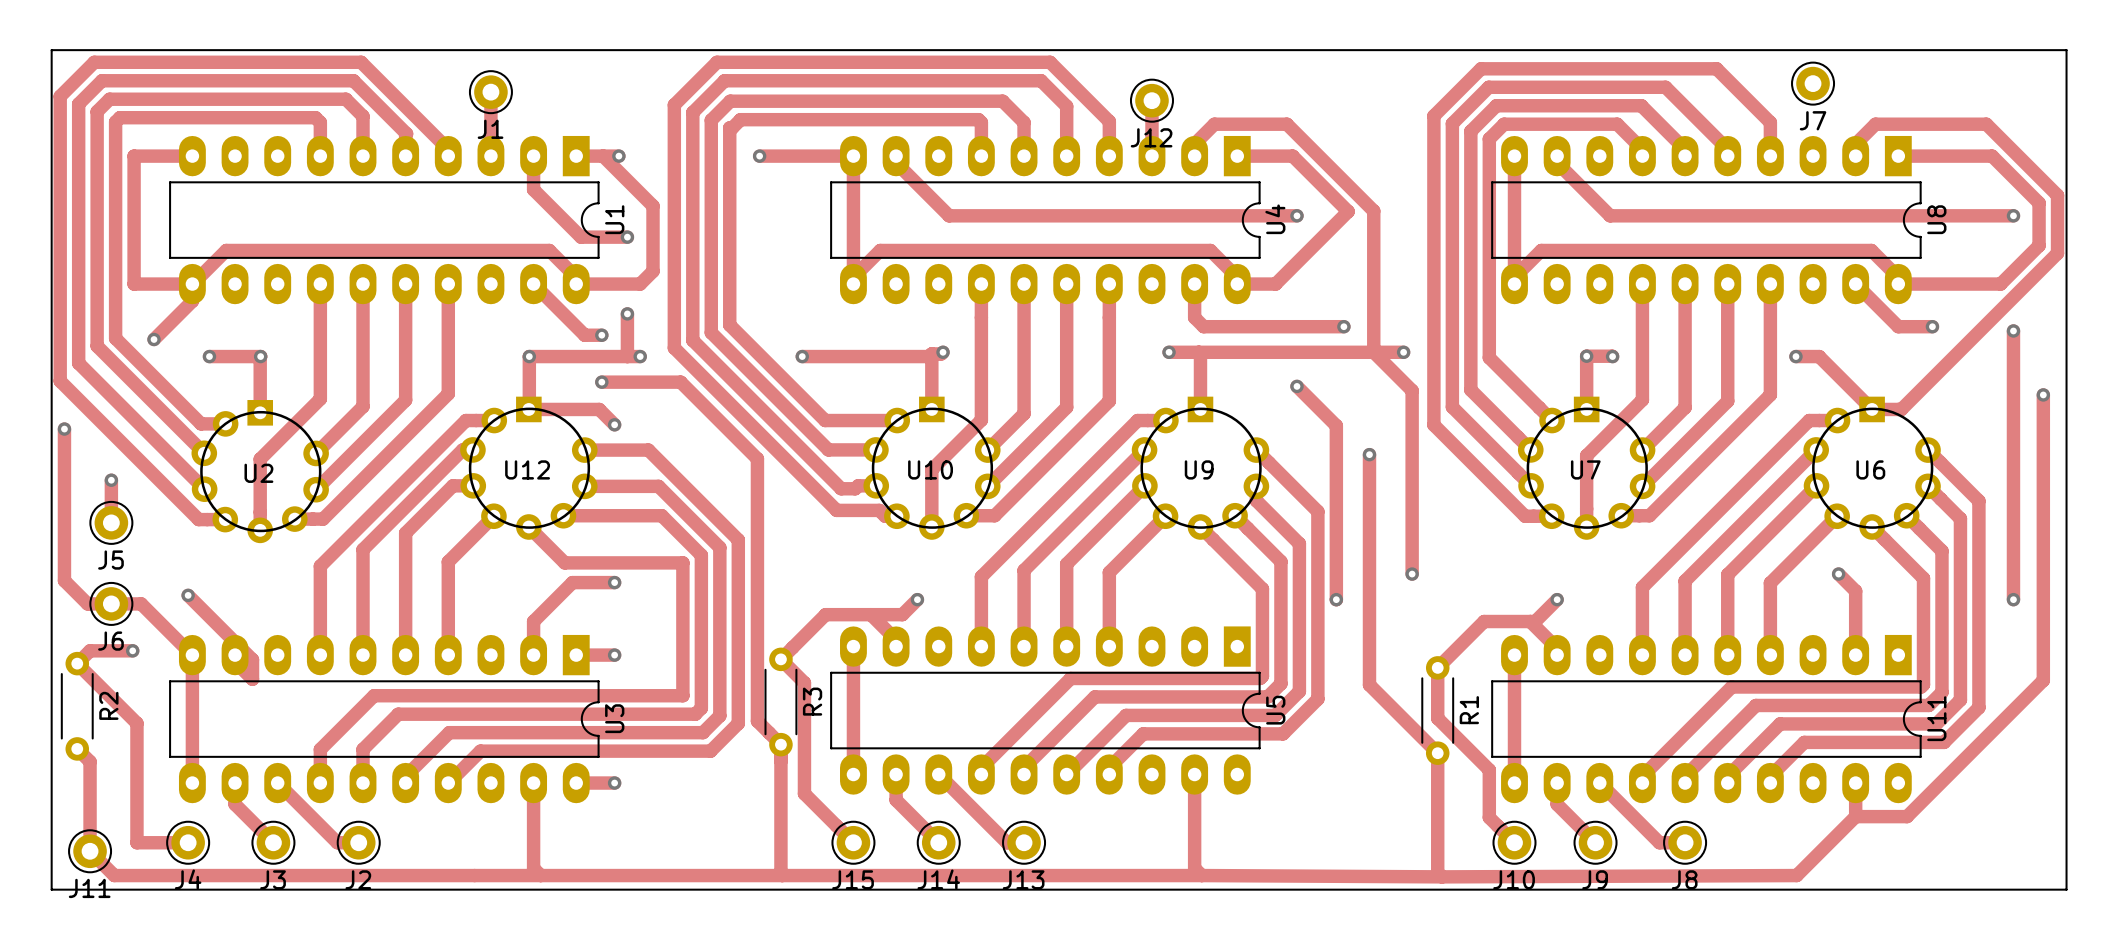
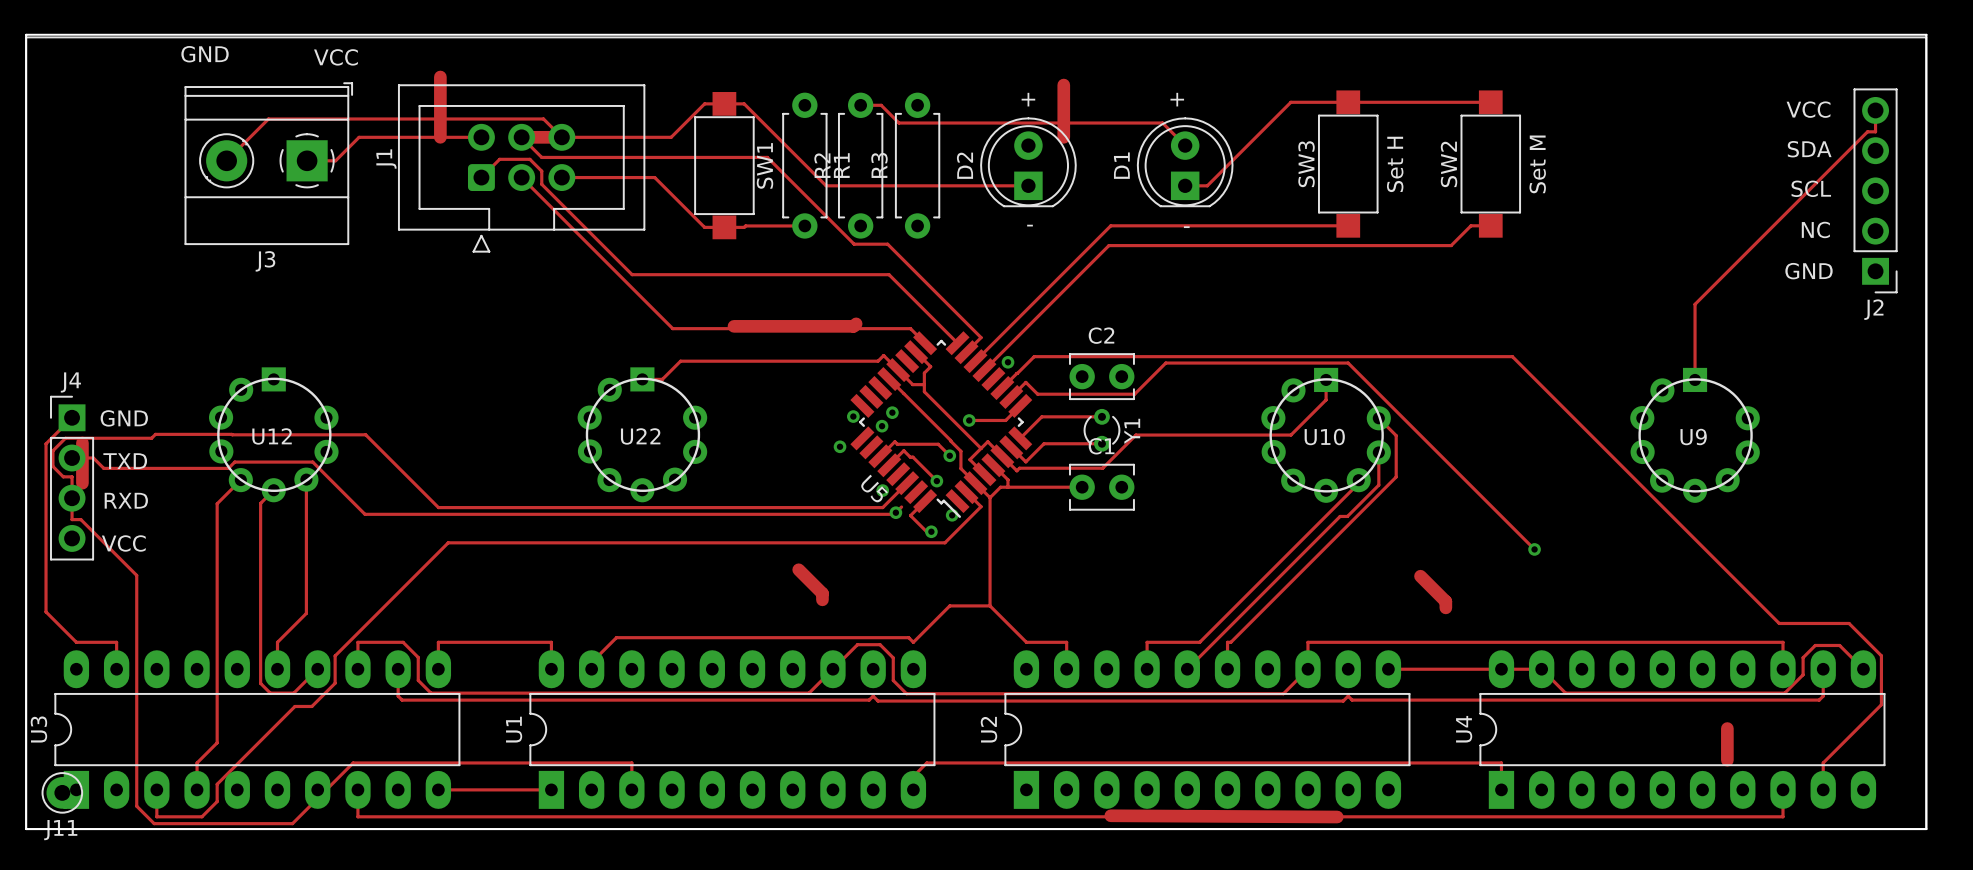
board edge: none -> (26, 34) (1926, 34) (1926, 829) (26, 829) (26, 34)
text: none -> GND (205, 54)
J1 footprint: [468, 70, 513, 115] -> [397, 84, 646, 253]
text: none -> VCC (335, 57)
J7: (1813, 83) -> none
J12: (1151, 100) -> none
text: none -> + (1028, 99)
text: none -> + (1177, 99)
track: none -> (1490, 102) (1290, 102) (1207, 185) (1185, 185)
track: none -> (860, 105) (881, 105) (898, 123) (1162, 123) (1185, 145)
text: none -> VCC (1808, 109)
track: none -> (1875, 110) (1875, 131) (1867, 131) (1695, 304) (1695, 379)
J1 name position: J1 (490, 129) -> J1 (386, 159)
track: (192, 156) (134, 156) (134, 284) (192, 284) (226, 250) (549, 250) (576, 277) (576, 284) (640, 284) (653, 271) (653, 206) (603, 156) -> none
track: (320, 156) (320, 122) (315, 117) (119, 117) (115, 122) (115, 338) (201, 423) (225, 423) -> none
track: (363, 156) (363, 116) (345, 99) (109, 99) (97, 111) (97, 346) (204, 453) -> none
track: (405, 156) (406, 133) (353, 80) (101, 80) (78, 104) (78, 363) (204, 489) -> none
track: (448, 156) (448, 149) (361, 62) (94, 62) (60, 96) (60, 381) (198, 519) (225, 519) -> none
track: (533, 156) (533, 189) (581, 237) (627, 237) -> none
track: none -> (481, 137) (359, 137) (335, 160) (307, 160)
track: none -> (521, 137) (541, 157) (767, 157) (854, 244) (887, 244) (981, 337) (966, 352)
via: (618, 156) -> none
track: (759, 156) (853, 156) (853, 284) -> none
via: (759, 156) -> none
track: (896, 156) (896, 162) (949, 215) (1296, 215) -> none
track: (981, 156) (981, 122) (978, 119) (740, 119) (732, 127) (729, 127) (729, 325) (825, 420) (897, 420) -> none
track: (1024, 156) (1024, 122) (1002, 101) (730, 101) (711, 120) (711, 332) (828, 449) (875, 449) -> none
track: (1066, 156) (1066, 106) (1041, 80) (724, 80) (692, 112) (692, 340) (841, 488) (855, 488) (858, 485) (876, 485) -> none
track: (1109, 156) (1109, 121) (1050, 62) (716, 62) (674, 104) (674, 348) (836, 510) (879, 510) (885, 516) (896, 516) -> none
track: (1194, 156) (1194, 144) (1214, 124) (1286, 124) (1373, 211) (1373, 352) (1412, 390) (1412, 574) -> none
track: (1237, 156) (1292, 156) (1348, 211) (1275, 284) (1237, 284) (1237, 277) (1210, 250) (880, 250) (853, 277) -> none
track: (1514, 156) (1514, 284) -> none
track: (1642, 156) (1642, 149) (1617, 124) (1504, 124) (1489, 138) (1489, 357) (1552, 420) -> none
track: (1685, 156) (1685, 149) (1641, 105) (1496, 105) (1470, 131) (1470, 390) (1530, 449) -> none
track: (1727, 156) (1727, 149) (1665, 87) (1488, 87) (1452, 123) (1452, 407) (1531, 485) -> none
track: (1770, 156) (1770, 122) (1716, 68) (1481, 68) (1433, 116) (1433, 424) (1525, 516) (1551, 516) -> none
track: (1855, 156) (1855, 144) (1875, 124) (1986, 124) (2057, 195) (2057, 253) (1901, 409) (1872, 409) (1819, 356) (1795, 356) -> none
track: (1898, 156) (1992, 156) (2039, 203) (2039, 245) (2000, 284) (1898, 284) (1898, 277) (1871, 250) (1541, 250) (1514, 277) -> none
track: (1561, 160) (1557, 156) (1557, 162) (1610, 215) (2013, 215) -> none
text: none -> SDA (1809, 149)
track: none -> (226, 160) (268, 118) (543, 118) (561, 137) (671, 137) (704, 103) (744, 103) (826, 185) (1028, 185)
D2: none -> (1028, 162)
D1: none -> (1185, 162)
SW3: none -> Set H (1348, 164)
SW2: none -> Set M (1490, 164)
SW1: none -> (724, 165)
track: none -> (481, 177) (499, 159) (529, 159) (541, 171) (541, 184) (632, 274) (889, 274) (957, 343)
track: none -> (521, 177) (672, 328) (910, 328) (925, 343)
track: none -> (561, 177) (654, 177) (704, 227) (804, 225)
text: none -> SCL (1811, 188)
via: (1296, 215) -> none
via: (2013, 215) -> none
U1 rotation: 0° (384, 220) -> 180° (732, 729)
U1 position: (384, 220) -> (732, 729)
U4 rotation: 0° (1045, 220) -> 180° (1682, 729)
U4 position: (1045, 220) -> (1682, 729)
U8: (1706, 220) -> none
via: (627, 237) -> none
text: none -> - (1030, 225)
track: none -> (1348, 225) (1110, 225) (975, 361)
track: none -> (1490, 225) (1470, 225) (1451, 245) (1108, 245) (984, 370)
text: none -> - (1186, 227)
text: none -> NC (1815, 229)
track: (192, 284) (192, 301) (154, 339) -> none
track: (320, 284) (320, 398) (260, 459) (260, 530) -> none
track: (363, 284) (363, 406) (316, 453) -> none
track: (405, 284) (405, 400) (316, 489) -> none
track: (448, 284) (448, 393) (323, 519) (294, 519) -> none
track: (533, 284) (584, 335) (601, 335) -> none
track: (981, 284) (981, 420) (931, 469) (931, 526) -> none
track: (1024, 284) (1024, 413) (987, 450) -> none
track: (1066, 284) (1066, 407) (987, 486) -> none
track: (1109, 284) (1109, 401) (994, 515) (966, 515) -> none
track: (1194, 284) (1194, 317) (1203, 326) (1343, 326) -> none
track: (1642, 284) (1642, 399) (1586, 455) (1586, 526) -> none
track: (1685, 284) (1685, 407) (1642, 450) -> none
track: (1727, 284) (1727, 401) (1642, 486) -> none
track: (1770, 284) (1770, 394) (1649, 515) (1621, 515) -> none
track: (1855, 284) (1898, 326) (1932, 326) -> none
text: none -> GND (1809, 271)
track: (627, 313) (627, 356) -> none
via: (627, 313) -> none
via: (1343, 326) -> none
via: (1932, 326) -> none
track: (2013, 330) (2013, 599) -> none
via: (2013, 330) -> none
via: (601, 335) -> none
via: (154, 339) -> none
track: (943, 352) (931, 353) (931, 409) -> none
via: (943, 352) -> none
track: (1169, 352) (1403, 352) -> none
via: (1169, 352) -> none
track: (1198, 352) (1200, 353) (1200, 409) -> none
via: (1403, 352) -> none
track: (209, 356) (260, 356) (260, 412) -> none
via: (209, 356) -> none
via: (260, 356) -> none
via: (529, 356) -> none
track: (640, 356) (529, 356) (528, 409) (599, 409) (614, 424) -> none
via: (640, 356) -> none
via: (802, 356) -> none
via: (1586, 356) -> none
track: (1612, 356) (1586, 356) (1586, 409) -> none
via: (1612, 356) -> none
via: (1795, 356) -> none
track: (601, 382) (680, 382) (757, 458) (757, 721) (780, 744) (782, 875) -> none
via: (601, 382) -> none
track: none -> (916, 352) (930, 366) (924, 373) (924, 391) (981, 448)
track: (1296, 386) (1336, 425) (1336, 599) -> none
via: (1296, 386) -> none
via: none -> (1008, 362)
track: (2043, 394) (2043, 680) (1907, 816) (1855, 816) (1796, 875) (1441, 876) (1437, 872) (1437, 753) (1369, 684) (1369, 454) -> none
via: (2043, 394) -> none
U2 footprint: [191, 400, 329, 544] -> [1004, 650, 1411, 809]
C2: none -> (1101, 376)
track: none -> (642, 379) (662, 379) (680, 361) (878, 361) (883, 355) (912, 384) (924, 384)
track: none -> (889, 379) (960, 451) (960, 468) (990, 497)
track: none -> (1326, 379) (1326, 399) (1290, 435) (1135, 435) (1102, 468) (1019, 468) (1016, 470) (987, 441) (969, 459) (984, 474)
track: (494, 420) (465, 420) (320, 566) (320, 655) (320, 650) -> none
track: (1165, 420) (1137, 420) (981, 576) (981, 646) -> none
track: (1837, 420) (1809, 420) (1642, 587) (1642, 655) -> none
track: none -> (1002, 387) (1034, 356) (1512, 356) (1779, 623) (1849, 623) (1881, 655) (1881, 704) (1823, 762) (1823, 789)
via: (614, 424) -> none
track: (64, 429) (64, 580) (87, 603) (141, 603) (192, 655) (192, 783) -> none
via: (64, 429) -> none
track: none -> (1011, 396) (1025, 382) (1037, 394) (1134, 394) (1165, 363) (1348, 363) (1534, 549)
track: none -> (1020, 405) (1005, 420) (969, 420)
via: none -> (892, 412)
track: (472, 449) (462, 449) (363, 549) (363, 655) -> none
track: (1144, 449) (1024, 570) (1024, 646) -> none
track: (1816, 449) (1685, 581) (1685, 655) -> none
track: (584, 450) (648, 450) (738, 539) (738, 723) (710, 751) (480, 751) (448, 783) -> none
track: (1256, 450) (1317, 511) (1317, 699) (1283, 733) (1143, 733) (1109, 767) (1109, 774) -> none
track: (1928, 450) (1978, 500) (1978, 707) (1944, 742) (1804, 742) (1770, 776) (1770, 783) -> none
via: none -> (853, 416)
track: none -> (1101, 416) (1041, 416) (1020, 438)
track: none -> (72, 417) (46, 443) (46, 611) (76, 642) (116, 642) (116, 669)
text: none -> GND (124, 418)
via: (1369, 454) -> none
track: none -> (1378, 418) (1396, 435) (1396, 477) (1230, 642) (1227, 642) (1227, 669)
via: none -> (969, 420)
via: none -> (882, 426)
Y1: none -> (1101, 430)
U12 position: (528, 468) -> (273, 434)
U10 position: (931, 468) -> (1326, 435)
U9 position: (1200, 468) -> (1695, 435)
U7: (1586, 468) -> none
U6: (1872, 468) -> none
U22: none -> (642, 434)
U2 name position: U2 (258, 473) -> U2 (988, 729)
via: (111, 480) -> none
track: none -> (1101, 443) (1044, 443) (1025, 461) (1011, 447)
via: none -> (840, 446)
track: (473, 485) (452, 485) (405, 533) (405, 655) -> none
track: (1144, 485) (1066, 564) (1066, 646) -> none
track: (1816, 485) (1727, 574) (1727, 655) -> none
track: (584, 486) (658, 486) (719, 547) (719, 715) (703, 732) (449, 732) (405, 776) (405, 783) -> none
track: (1256, 486) (1256, 500) (1299, 543) (1299, 691) (1275, 715) (1126, 715) (1067, 774) -> none
track: (1928, 486) (1960, 518) (1960, 699) (1936, 723) (1780, 723) (1727, 776) (1727, 783) -> none
track: none -> (1378, 452) (1378, 485) (1347, 516) (1340, 516) (1187, 669)
track: none -> (949, 455) (938, 444) (897, 444) (894, 441) (880, 456)
via: none -> (949, 455)
track: none -> (72, 458) (93, 458) (103, 468) (228, 468) (234, 462) (312, 462) (365, 514) (894, 514) (901, 506)
text: none -> TXD (125, 461)
track: none -> (889, 465) (903, 450) (936, 481)
track: none -> (993, 465) (1007, 479) (1007, 487)
track: (563, 515) (661, 515) (701, 555) (701, 708) (695, 714) (398, 714) (363, 749) (363, 783) -> none
track: (1235, 515) (1280, 561) (1280, 683) (1267, 696) (1094, 696) (1024, 767) (1024, 774) -> none
track: (1906, 515) (1941, 551) (1941, 692) (1928, 705) (1755, 705) (1685, 776) (1685, 783) -> none
track: (493, 516) (448, 561) (448, 655) -> none
track: (1165, 516) (1109, 572) (1109, 646) -> none
track: (1837, 516) (1770, 583) (1770, 655) -> none
track: none -> (240, 480) (217, 503) (217, 742) (197, 762) (197, 789)
track: none -> (306, 479) (306, 613) (277, 642) (277, 669)
track: none -> (1358, 480) (1358, 483) (1199, 642) (1147, 642) (1147, 669)
via: none -> (936, 481)
J5: (111, 522) -> none
track: none -> (907, 483) (882, 507) (438, 507) (365, 434) (155, 434) (151, 438) (65, 438) (52, 450) (52, 466) (63, 476) (72, 476) (72, 519) (80, 519) (136, 575) (136, 806) (154, 823) (292, 823) (353, 762) (631, 762) (631, 789)
track: (528, 526) (564, 562) (682, 562) (682, 695) (374, 695) (320, 749) (320, 783) -> none
track: (1200, 526) (1262, 588) (1262, 676) (1260, 678) (1070, 678) (981, 767) (981, 774) -> none
track: (1872, 526) (1923, 578) (1923, 684) (1921, 687) (1731, 687) (1642, 776) (1642, 783) -> none
track: none -> (1082, 487) (1000, 487) (990, 497)
C1: none -> (1101, 487)
track: none -> (273, 490) (260, 503) (260, 683) (270, 693) (293, 693) (317, 669)
via: none -> (882, 490)
track: none -> (966, 492) (981, 506) (944, 542) (448, 542) (335, 655) (335, 683) (311, 706) (294, 706) (217, 784) (217, 801) (201, 816) (156, 816) (156, 789)
track: none -> (990, 497) (990, 605)
text: none -> RXD (126, 500)
track: none -> (925, 501) (910, 515) (926, 531) (931, 531)
via: none -> (895, 512)
via: none -> (952, 515)
via: none -> (931, 531)
via: (1412, 574) -> none
track: (1838, 574) (1855, 591) (1855, 655) -> none
via: (1838, 574) -> none
track: (614, 582) (572, 582) (533, 621) (533, 655) -> none
via: (614, 582) -> none
text: none -> VCC (123, 543)
via: none -> (1534, 549)
track: (188, 595) (252, 659) (252, 679) (235, 661) (235, 655) -> none
via: (188, 595) -> none
track: (917, 599) (902, 614) (825, 614) (780, 659) (804, 682) (804, 793) (853, 842) -> none
via: (917, 599) -> none
via: (1336, 599) -> none
track: (1557, 599) (1535, 621) (1484, 621) (1437, 667) (1437, 718) (1489, 769) (1489, 817) (1514, 842) -> none
via: (1557, 599) -> none
via: (2013, 599) -> none
J6: (111, 603) -> none
U5 footprint: [830, 626, 1261, 795] -> [850, 331, 1033, 518]
track: (853, 646) (853, 774) -> none
R3 footprint: [764, 647, 798, 757] -> [894, 92, 941, 239]
track: (132, 650) (90, 650) (77, 663) (136, 723) (136, 842) (188, 842) -> none
via: (132, 650) -> none
R2 footprint: [60, 651, 94, 761] -> [838, 92, 884, 239]
track: none -> (990, 605) (949, 605) (913, 642) (908, 637) (616, 637) (591, 662)
track: none -> (990, 605) (1026, 642) (1066, 642) (1066, 669)
track: (576, 655) (614, 655) -> none
via: (614, 655) -> none
track: (1514, 655) (1514, 783) -> none
R1 footprint: [1421, 656, 1455, 765] -> [782, 92, 828, 239]
R3 name position: R3 (812, 701) -> R3 (879, 165)
R2 name position: R2 (108, 705) -> R2 (822, 165)
U5 name position: U5 (1275, 710) -> U5 (874, 488)
U3 rotation: 0° (384, 719) -> 180° (257, 729)
U11: (1706, 719) -> none
track: none -> (357, 669) (357, 642) (403, 642) (418, 657) (418, 680) (430, 693) (809, 693) (857, 644) (880, 644) (893, 657) (893, 680) (906, 693) (1283, 693) (1307, 669) (1307, 642) (1782, 642) (1782, 669)
track: none -> (398, 669) (398, 696) (402, 700) (869, 700) (873, 696) (878, 701) (1343, 701) (1348, 696) (1352, 700) (1819, 700) (1823, 696) (1823, 669)
track: none -> (438, 669) (438, 642) (551, 642) (551, 669)
track: none -> (1388, 669) (1541, 669) (1565, 693) (1784, 693) (1803, 674) (1803, 657) (1815, 645) (1839, 645) (1863, 669)
track: (77, 748) (90, 761) (90, 851) (114, 875) (1201, 875) (1194, 868) (1194, 774) -> none
track: (896, 774) (896, 800) (938, 842) -> none
track: (938, 774) (1006, 842) (1024, 842) -> none
track: (235, 783) (235, 804) (273, 842) -> none
track: (277, 783) (337, 842) (358, 842) -> none
track: (533, 783) (533, 868) (540, 875) -> none
track: (576, 783) (614, 783) -> none
via: (614, 783) -> none
track: (1557, 783) (1557, 804) (1595, 842) -> none
track: (1599, 783) (1659, 842) (1685, 842) -> none
J4 footprint: [166, 820, 211, 865] -> [50, 395, 95, 561]
J3 footprint: [251, 820, 296, 865] -> [184, 82, 354, 246]
J2 footprint: [336, 820, 381, 865] -> [1853, 88, 1898, 294]
J15: (853, 842) -> none
J14: (938, 842) -> none
J13: (1024, 842) -> none
J10: (1514, 842) -> none
J9: (1595, 842) -> none
J8: (1685, 842) -> none
track: none -> (357, 789) (357, 816) (1782, 816) (1782, 789)
track: none -> (438, 789) (551, 789)
track: none -> (913, 789) (913, 776) (926, 762) (1501, 762) (1501, 789)
J4 name position: J4 (188, 879) -> J4 (70, 382)
J3 name position: J3 (273, 879) -> J3 (265, 261)
J2 name position: J2 (358, 879) -> J2 (1873, 309)

